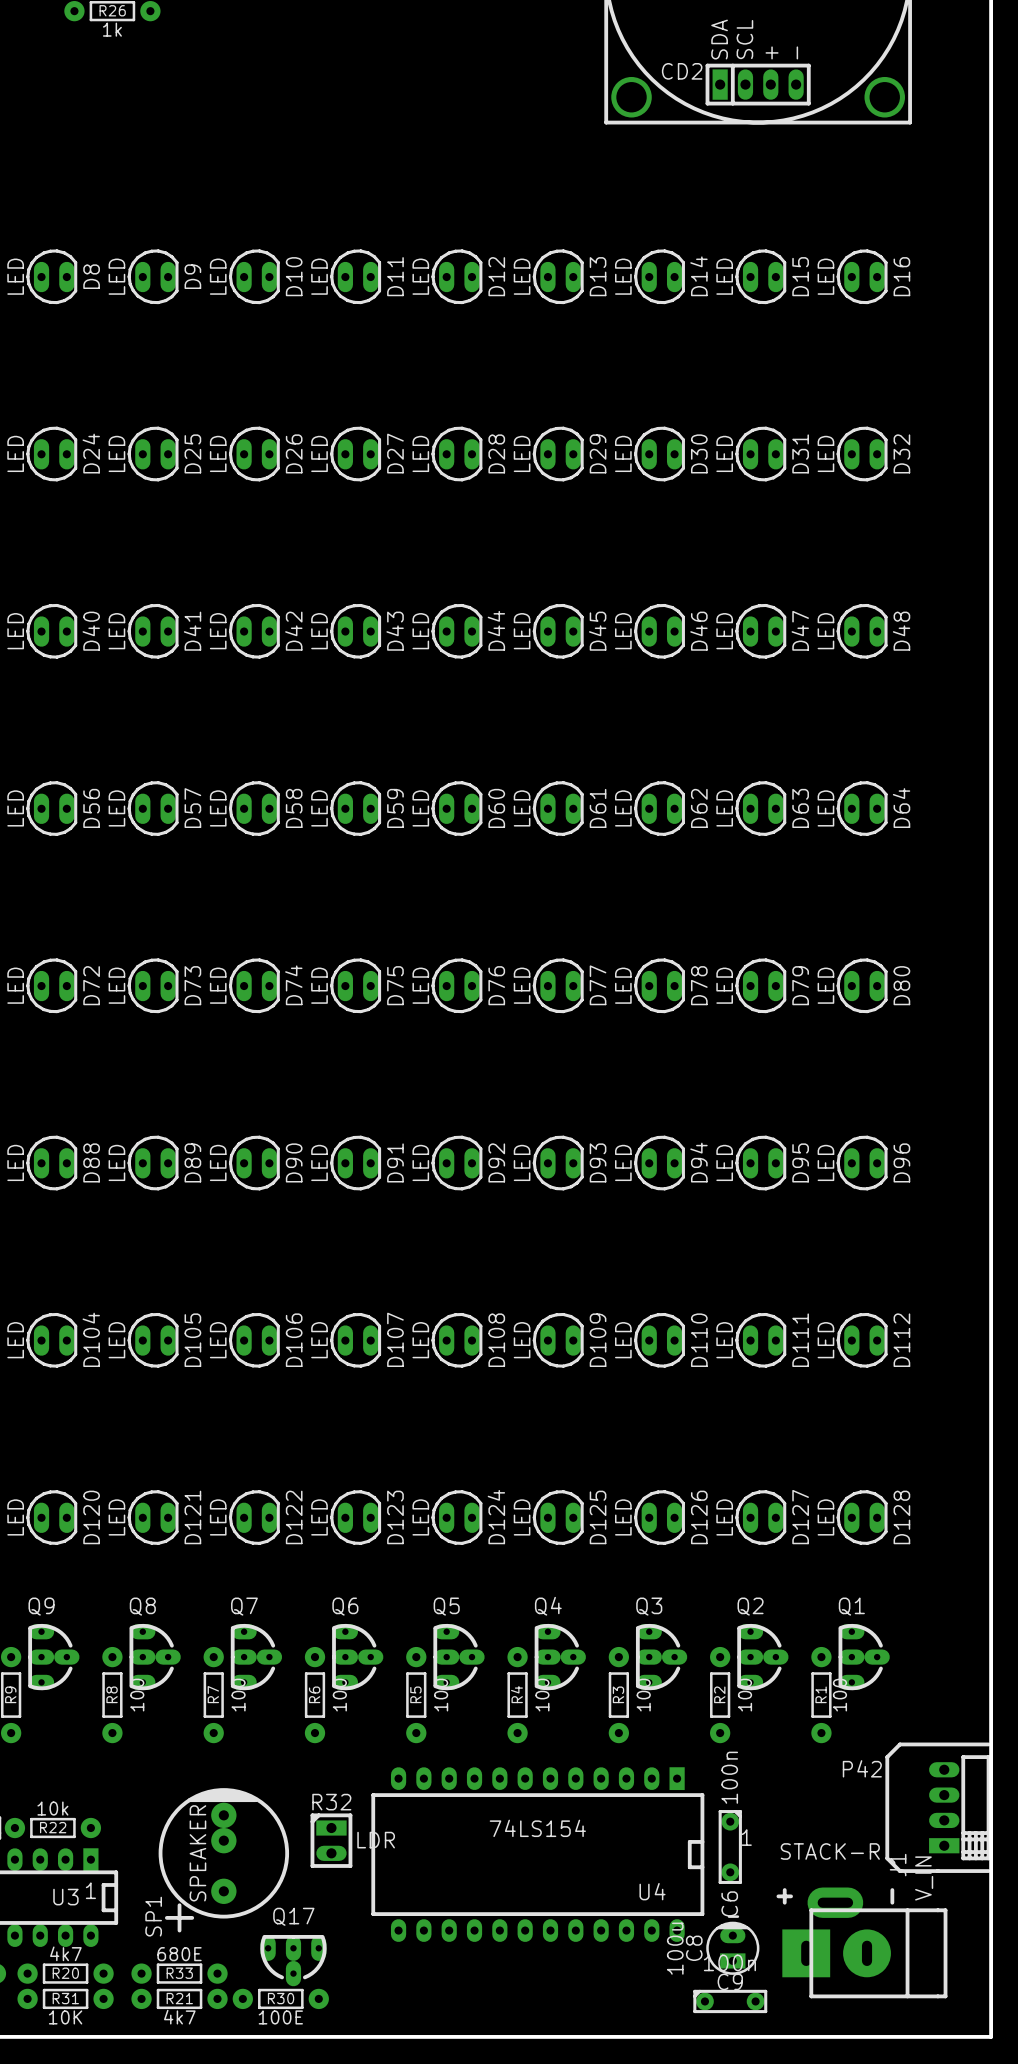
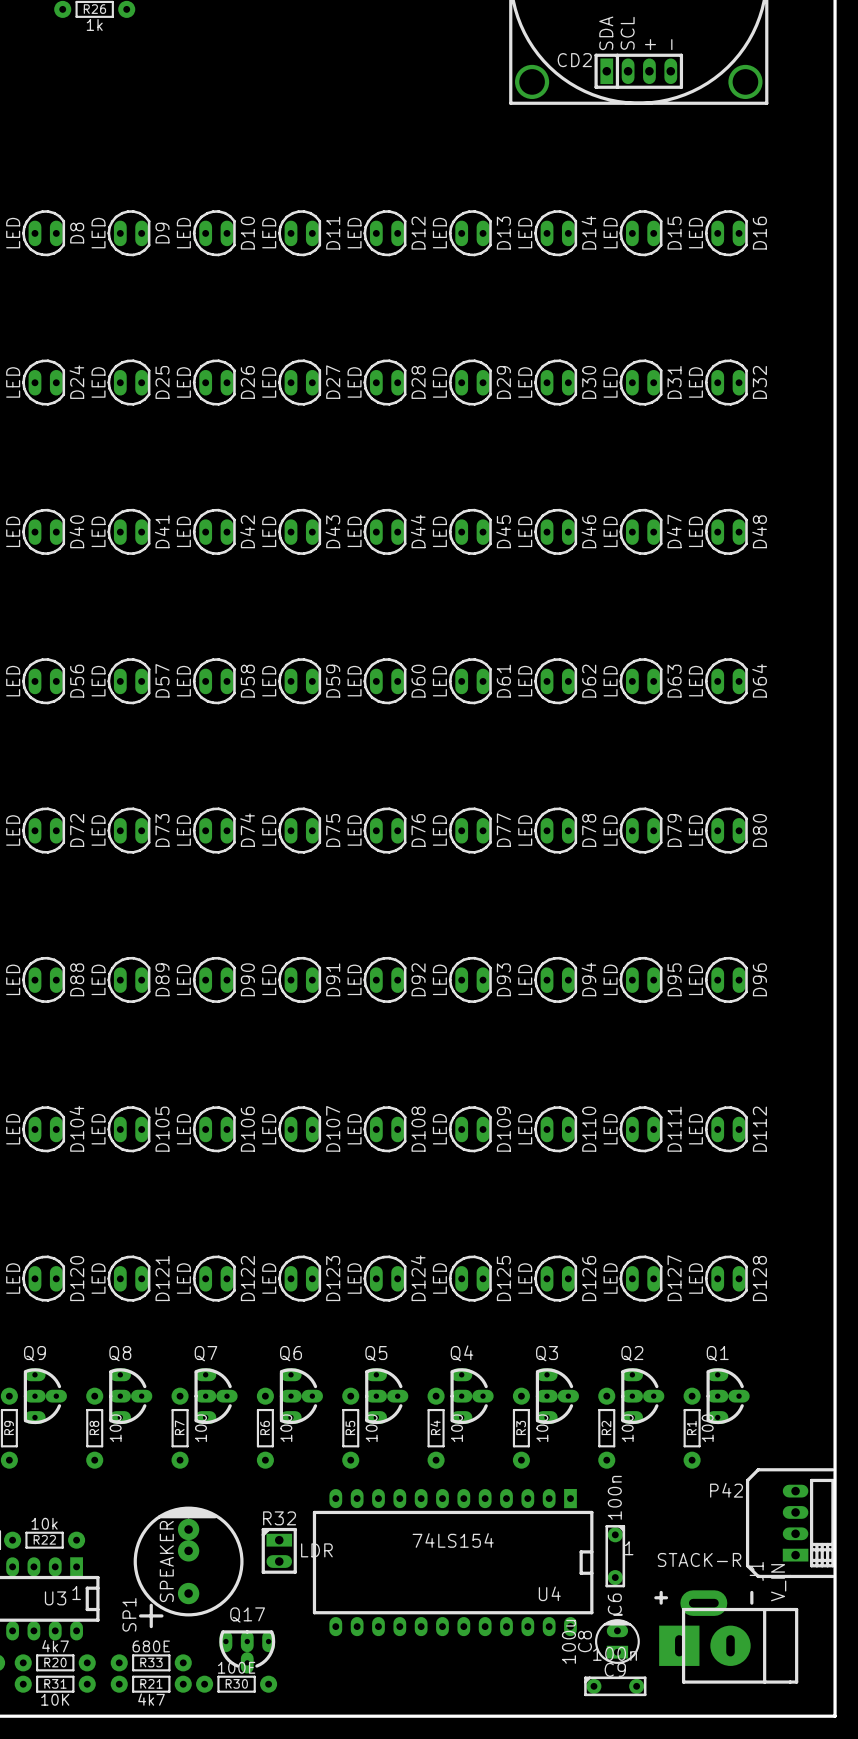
R30 value position: 100E (280, 2017) -> 100E (236, 1667)

